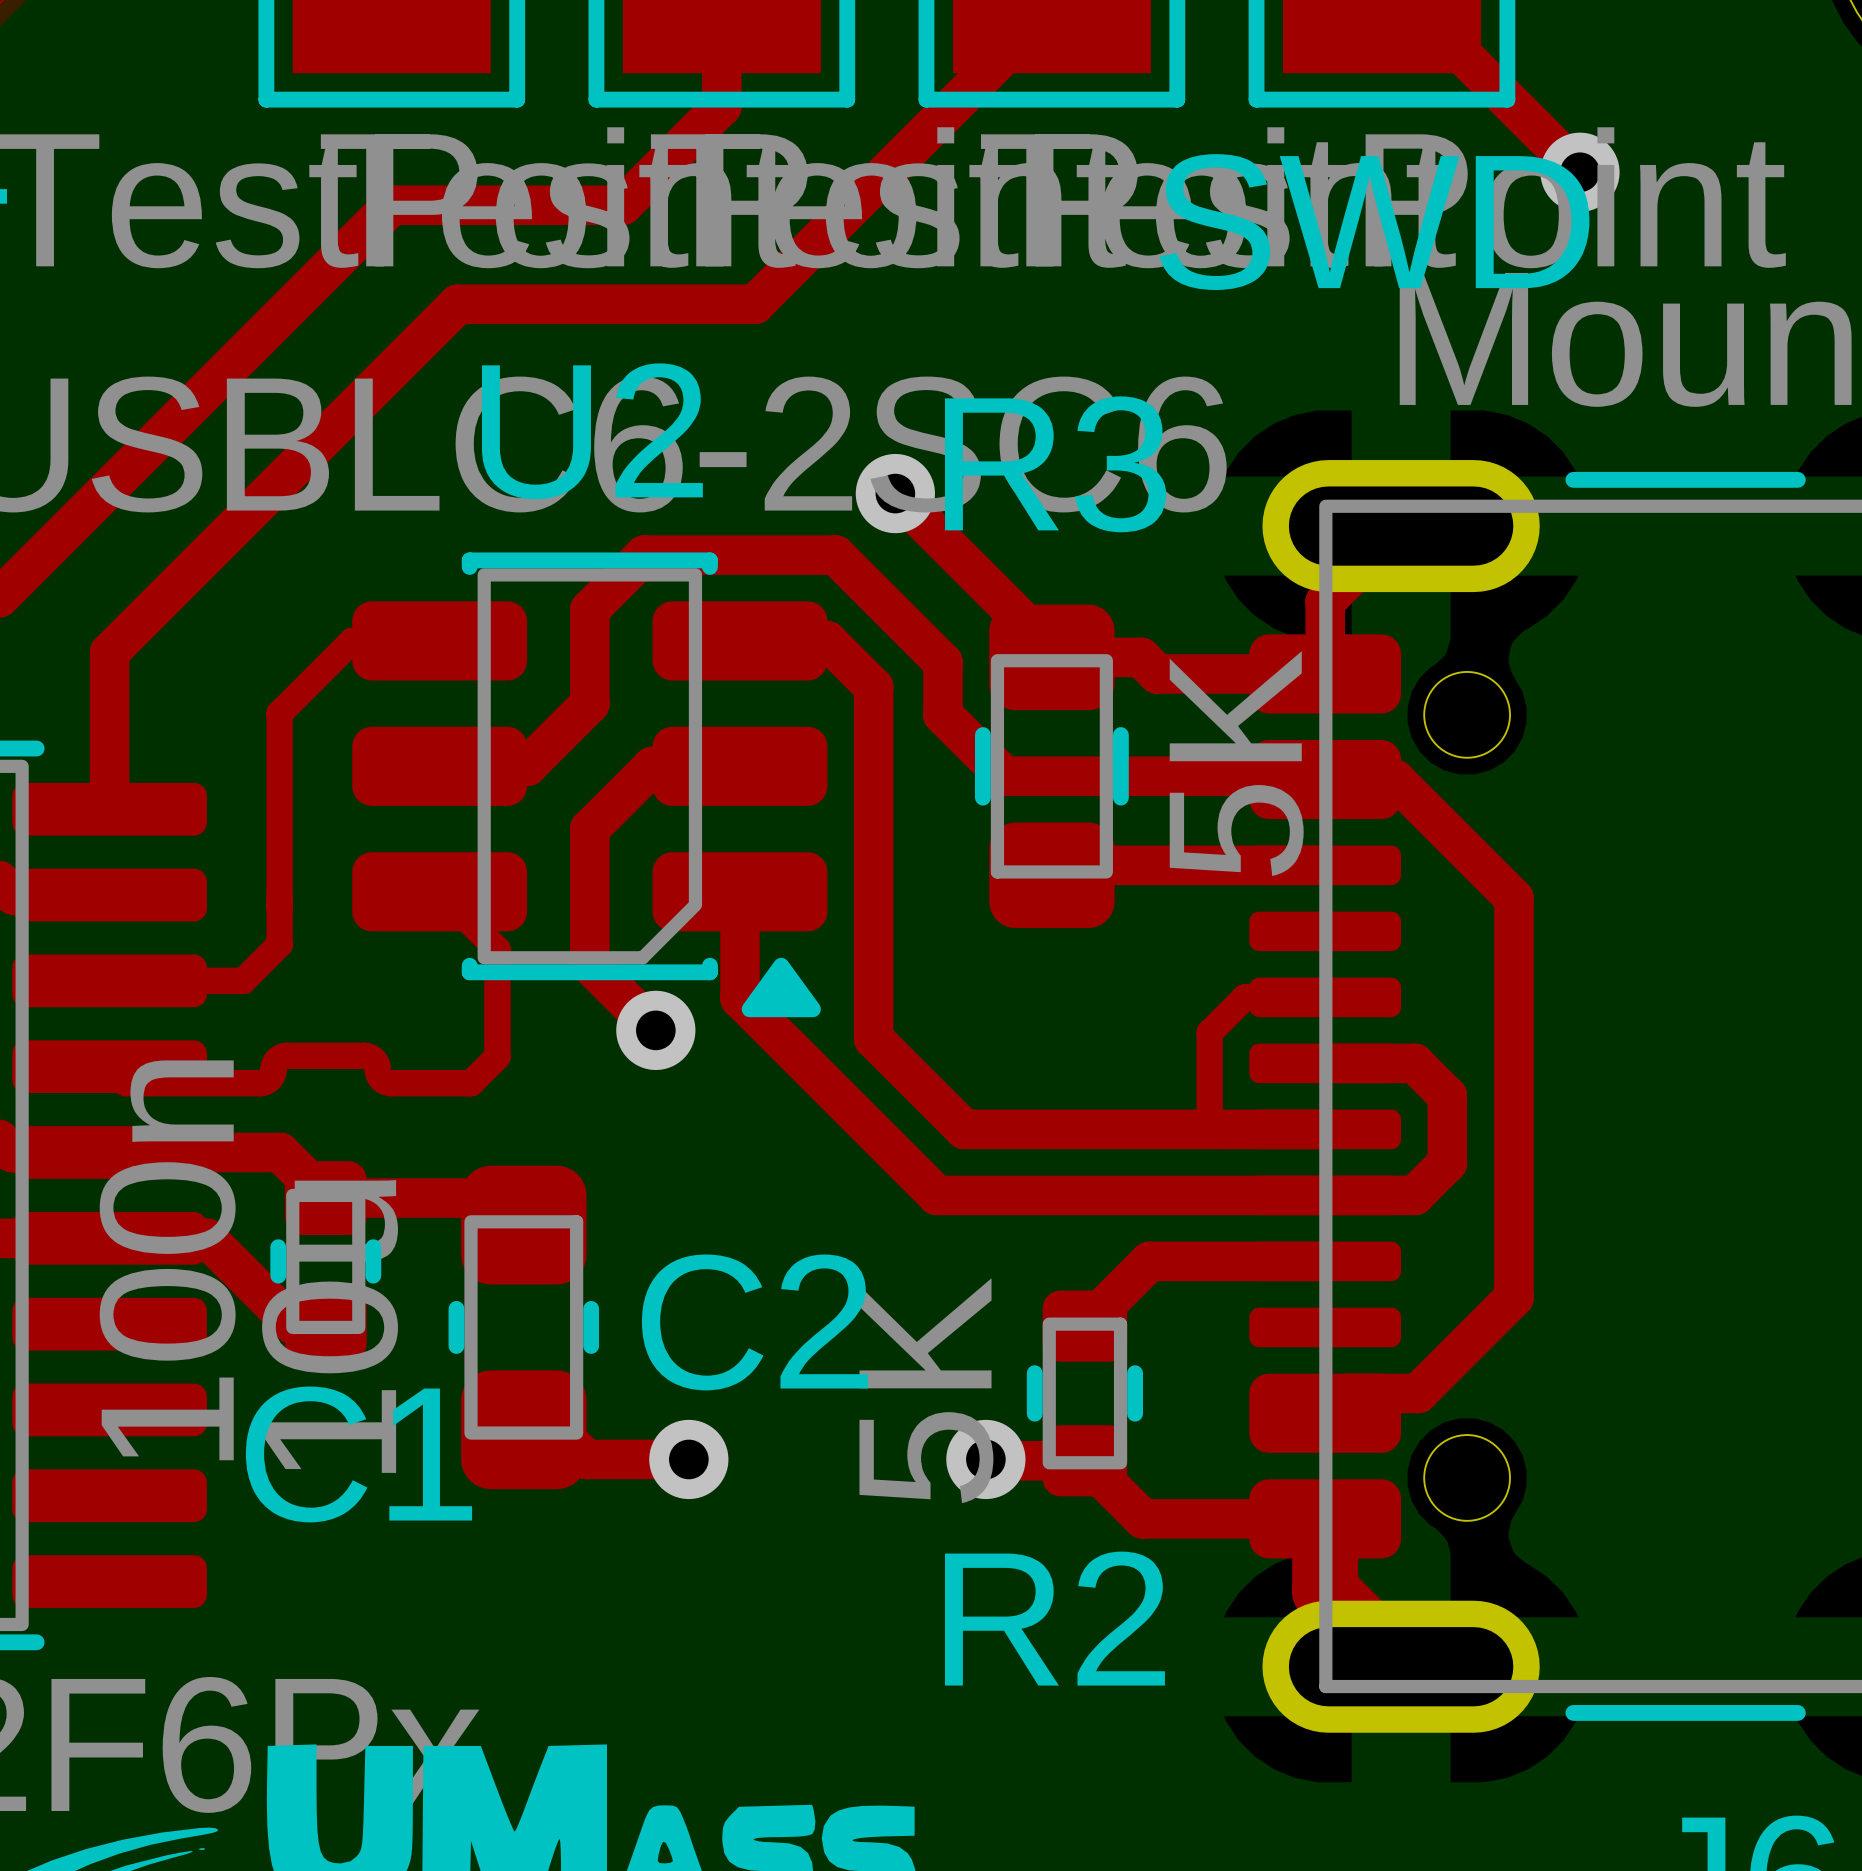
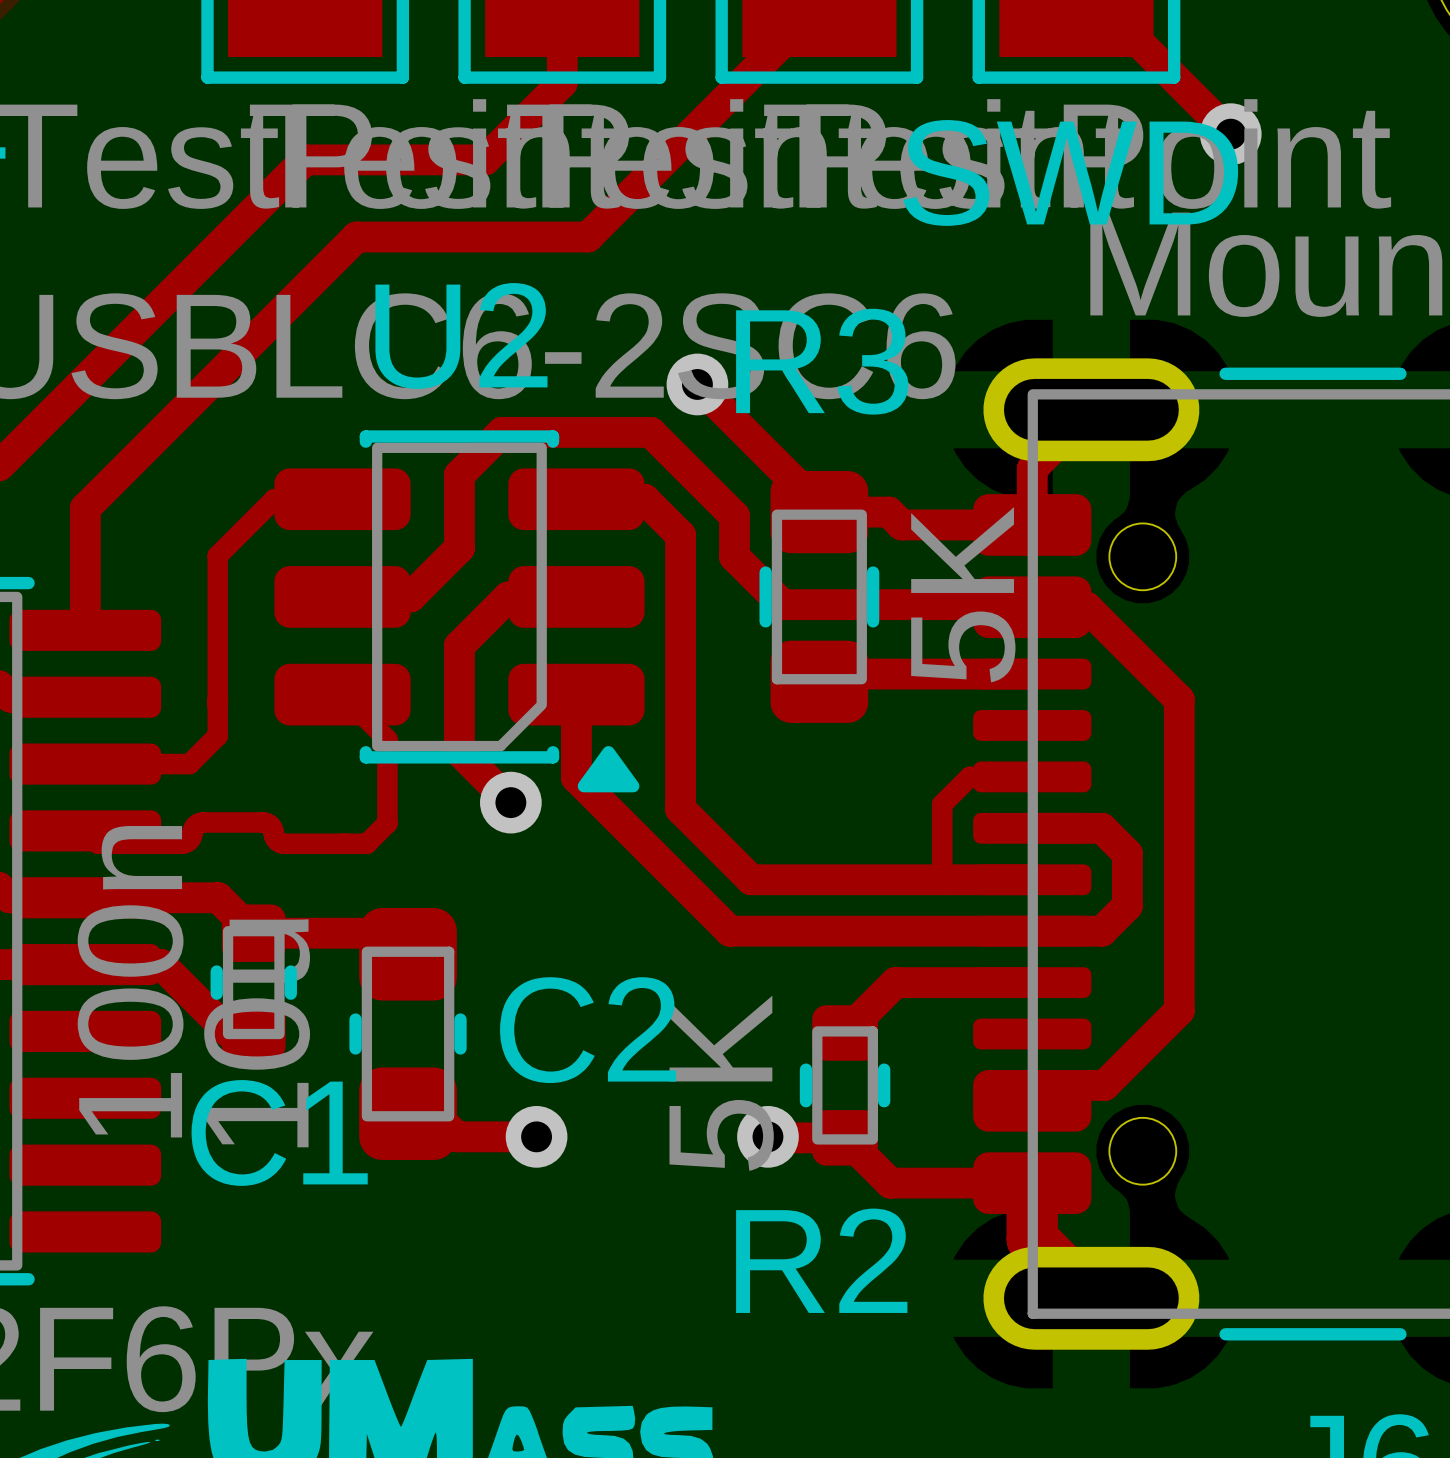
top track: (287, 1055) (276, 1061) (272, 1075) (265, 1081) (233, 1083) -> (223, 822) (198, 823) (193, 828) (190, 839) (181, 843)
top track: (337, 1055) (370, 1057) (376, 1063) (380, 1078) (391, 1083) -> (263, 822) (271, 826) (274, 837) (279, 842) (304, 843)

